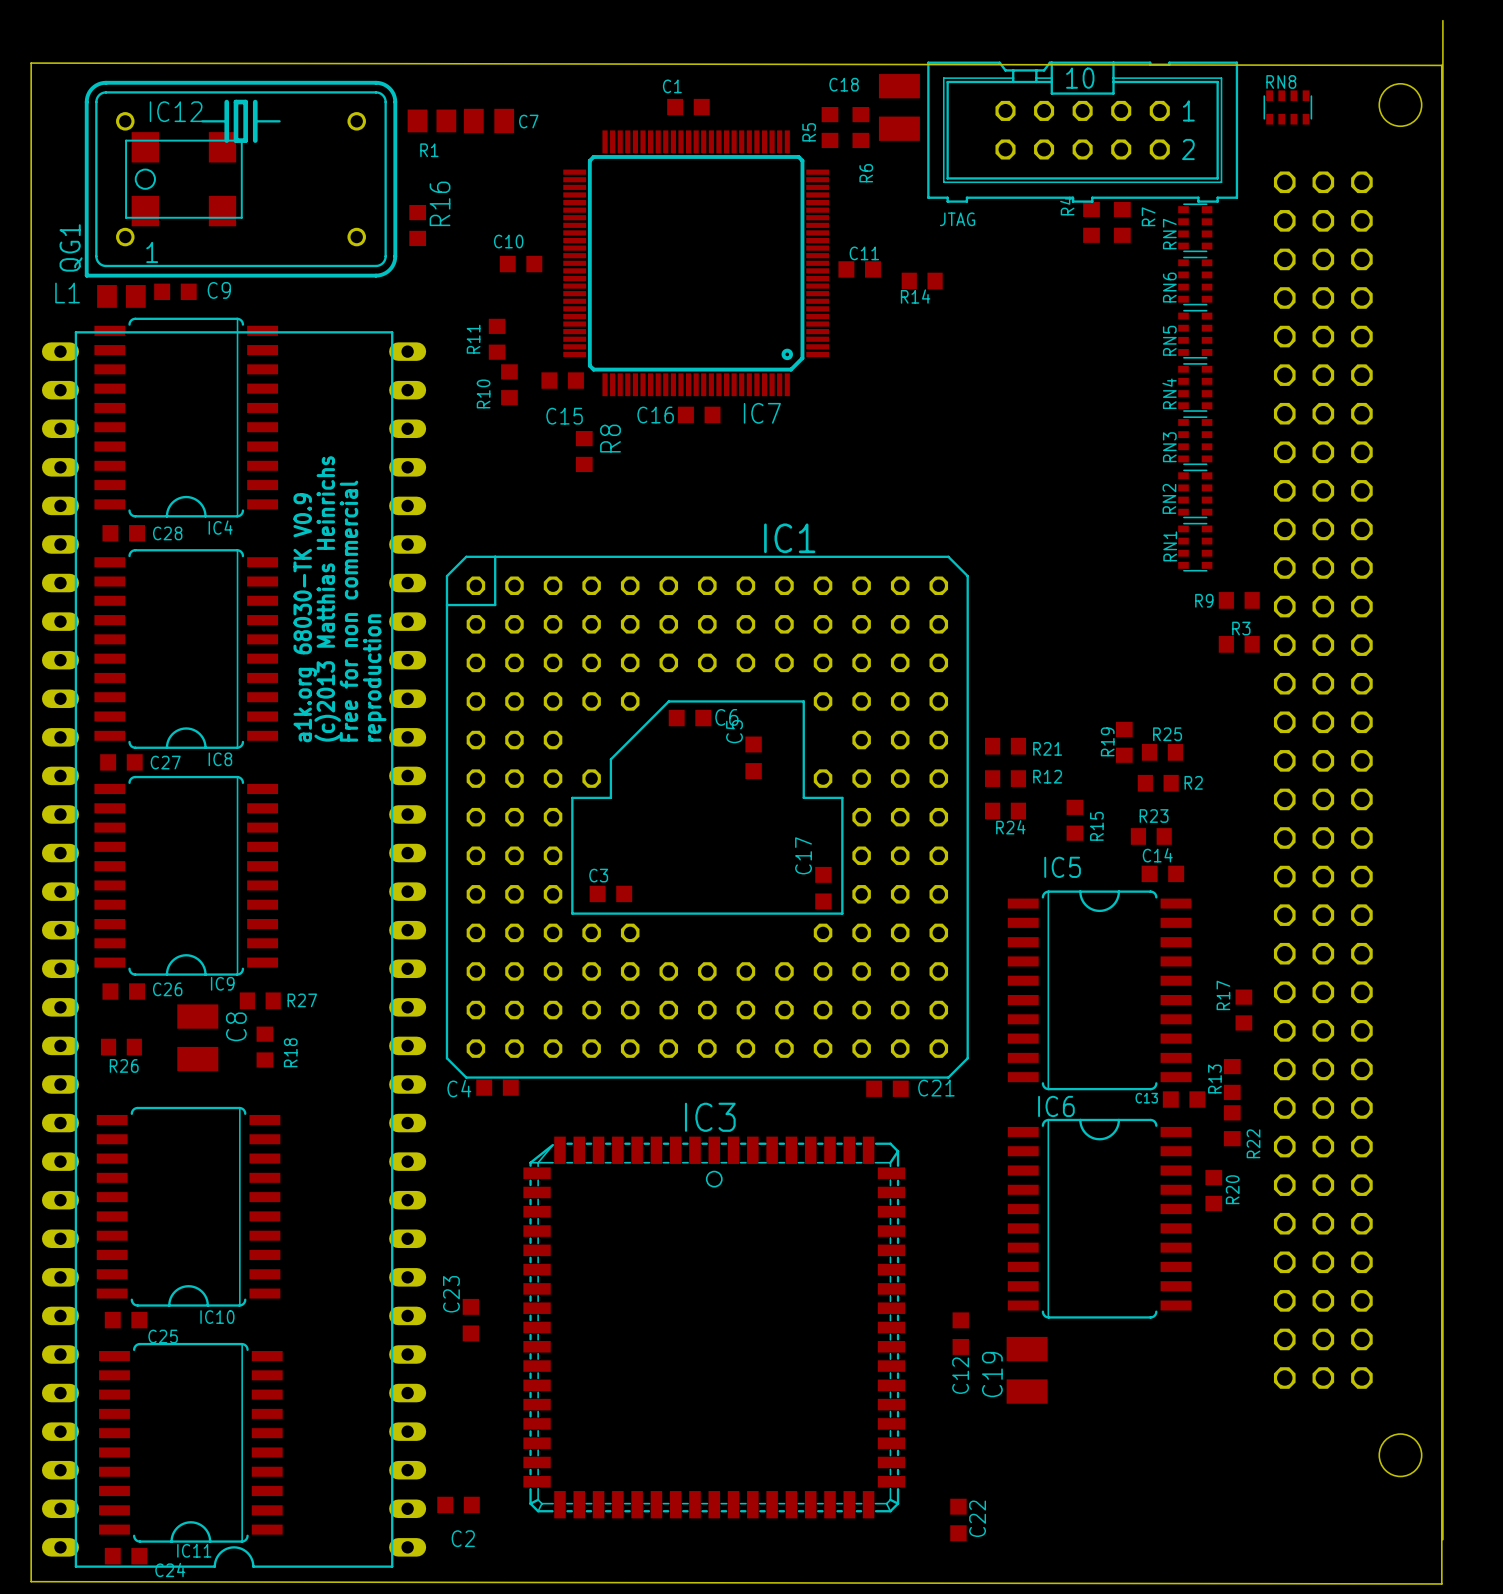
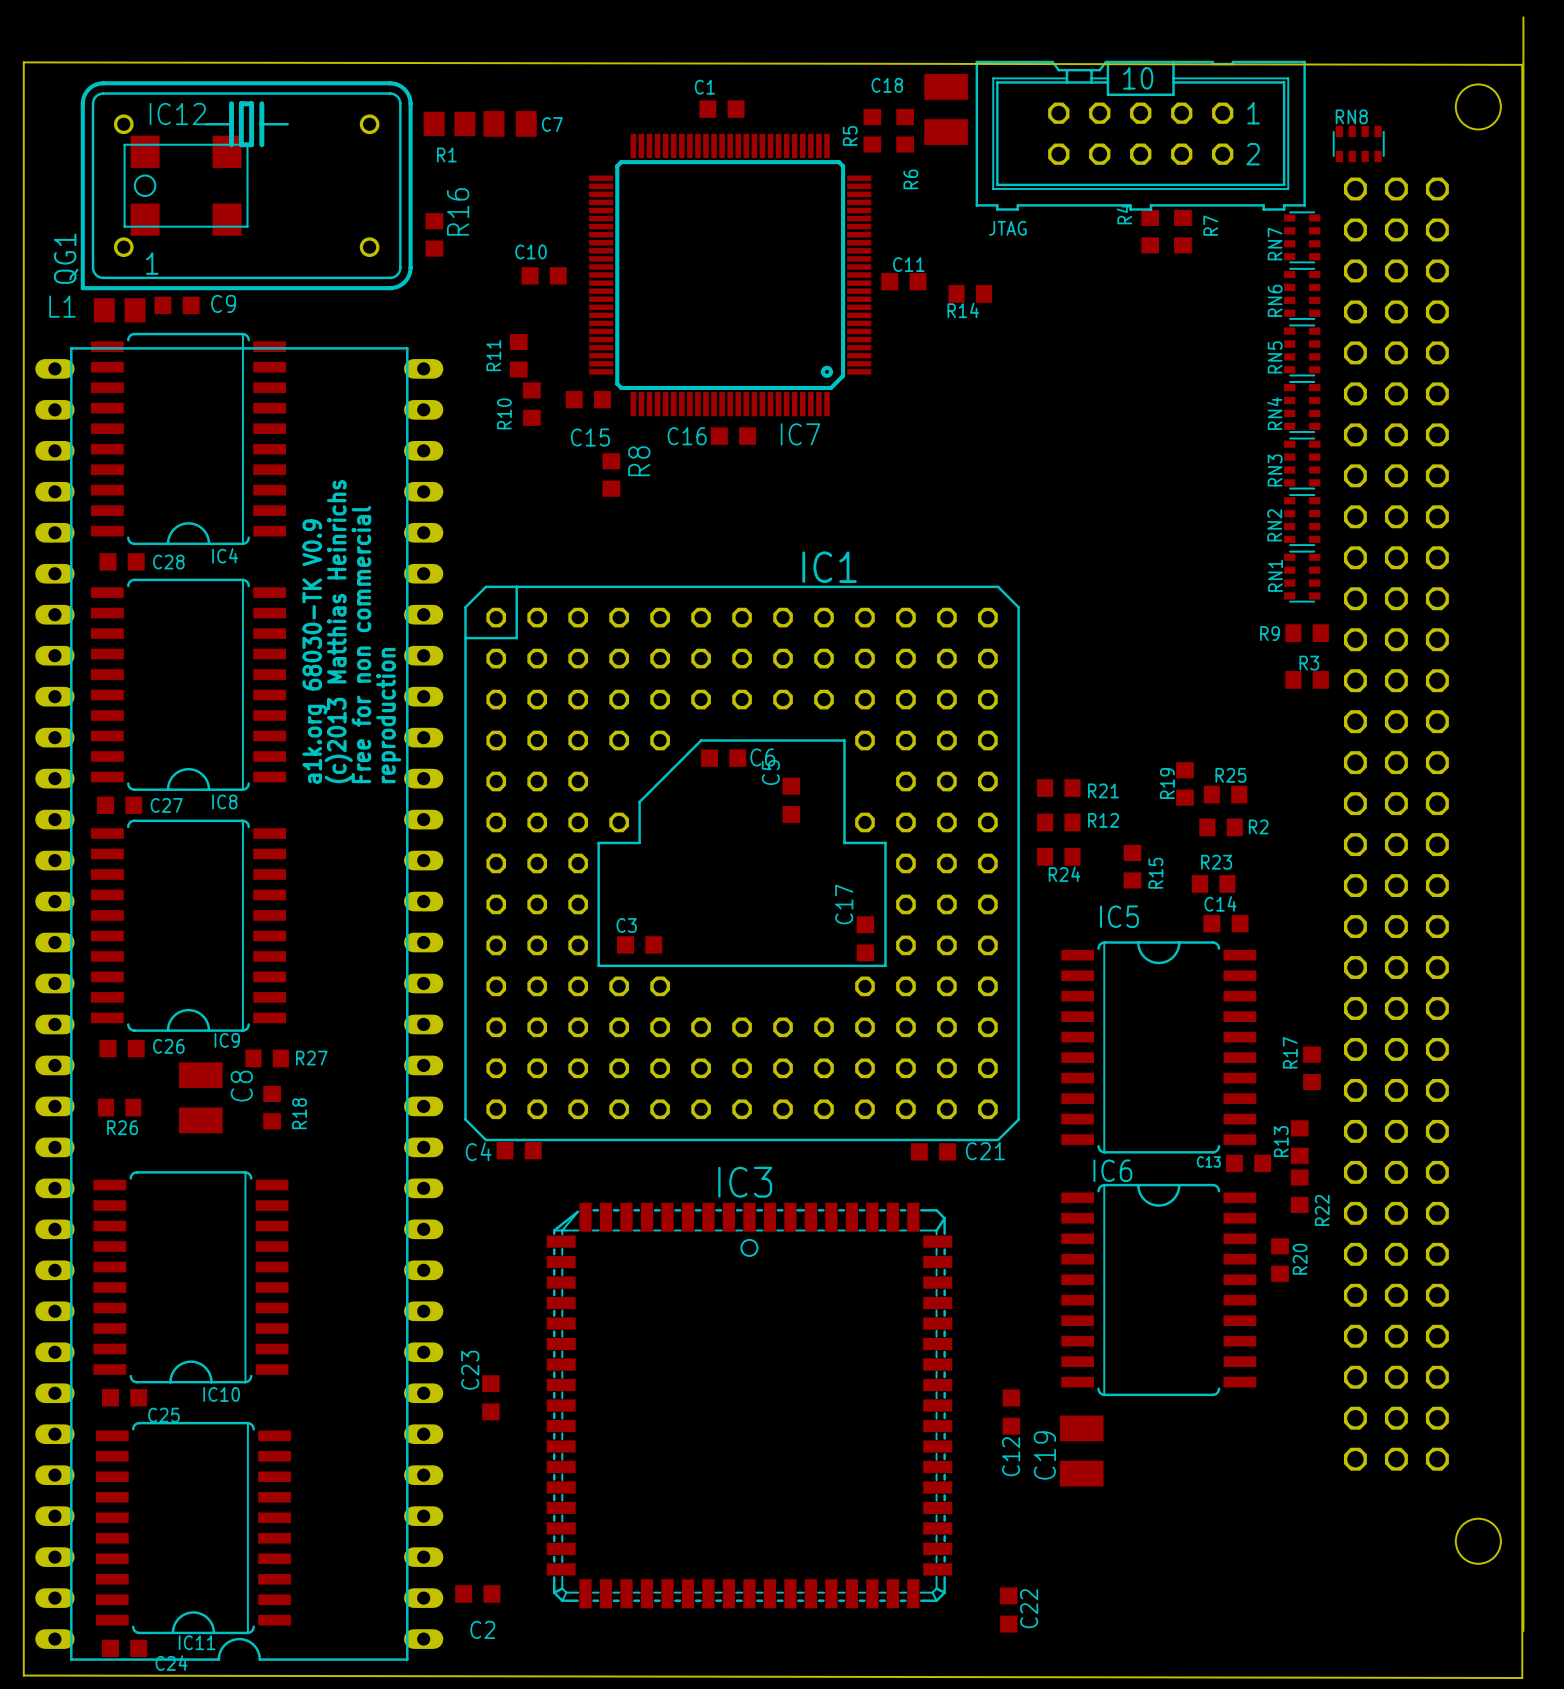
RN8 position: (1287, 107) -> (1358, 143)
RN7 position: (1195, 227) -> (1302, 237)
RN6 position: (1195, 281) -> (1302, 293)
RN5 position: (1195, 334) -> (1302, 350)
RN4 position: (1195, 387) -> (1302, 406)
RN3 position: (1195, 440) -> (1302, 463)
RN2 position: (1195, 493) -> (1302, 520)
RN1 position: (1195, 547) -> (1302, 576)

